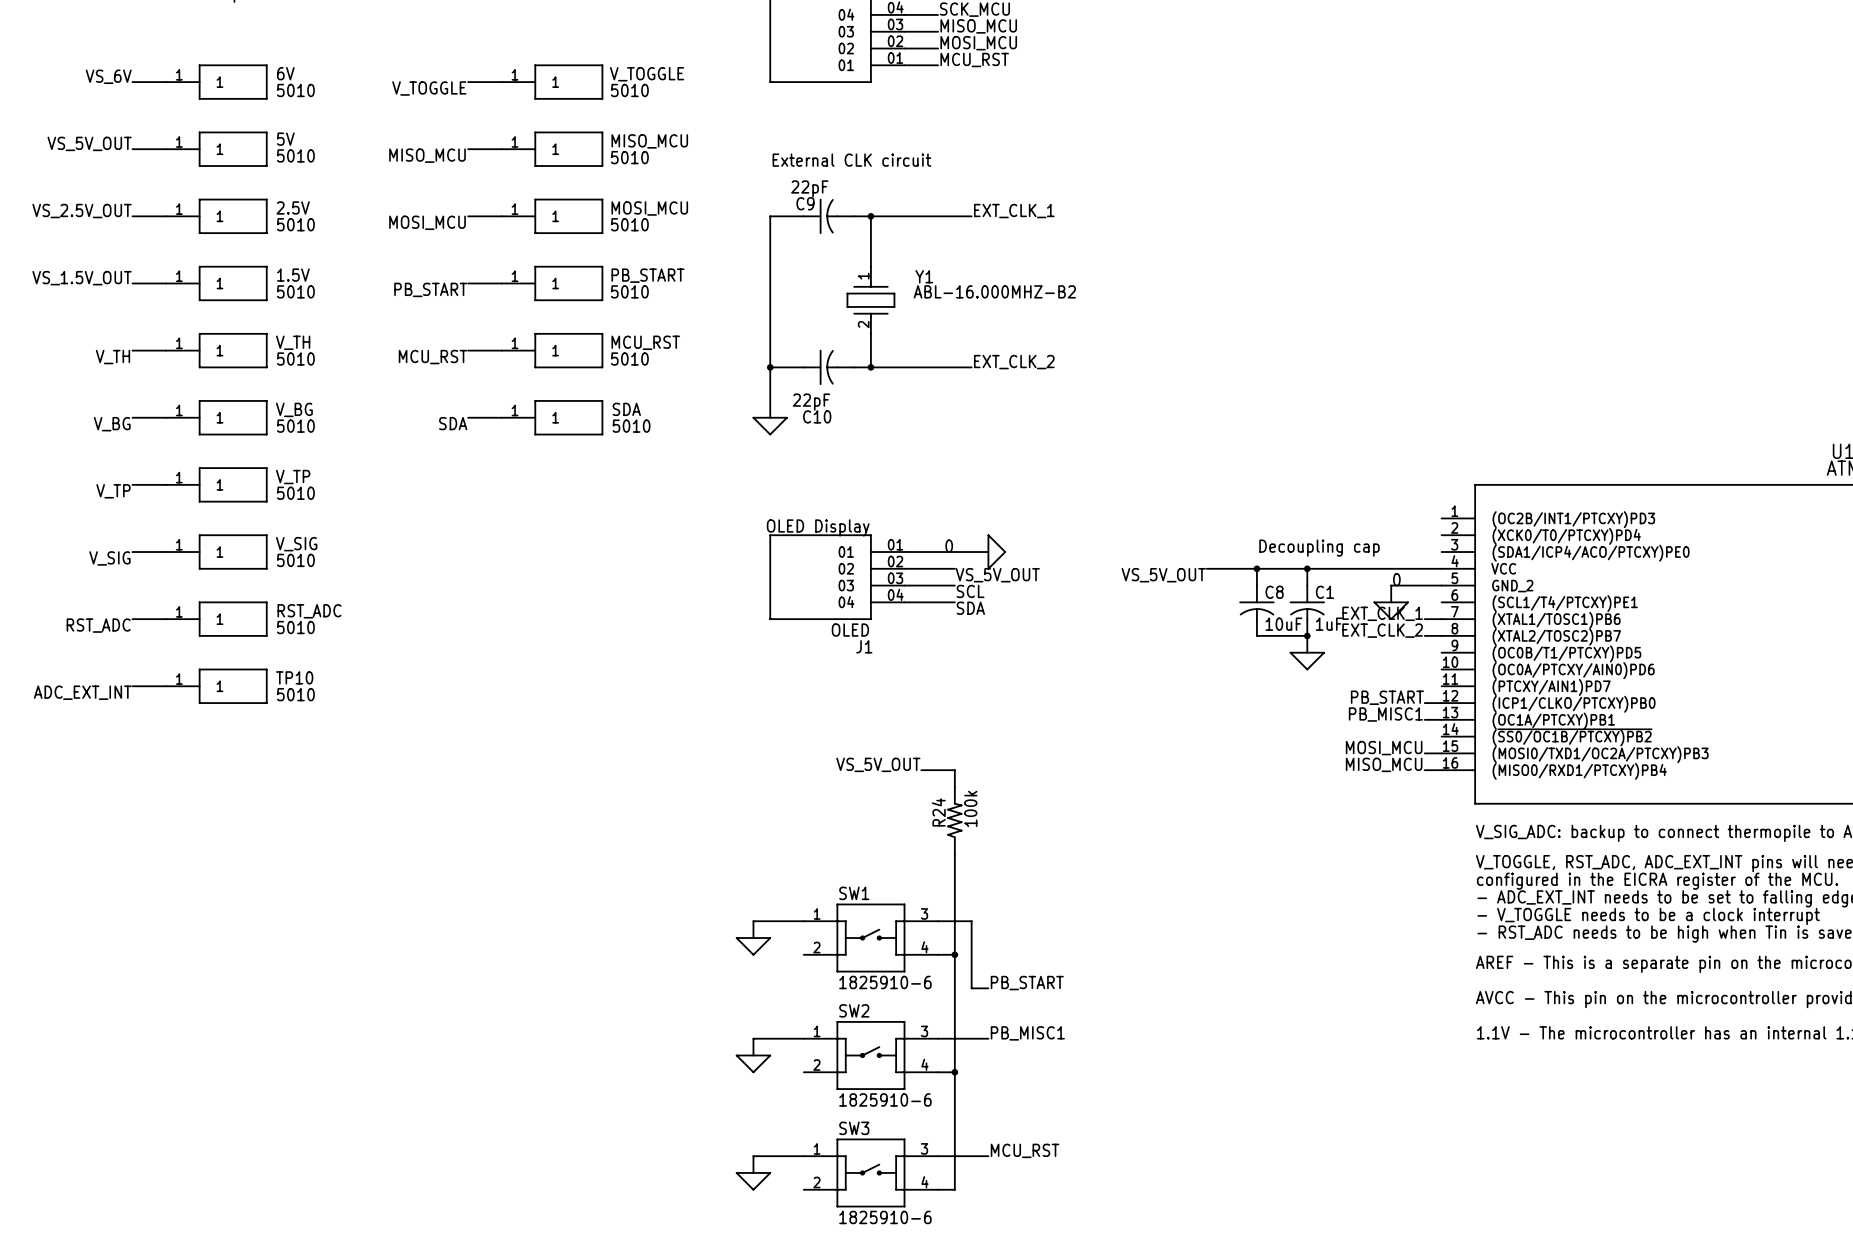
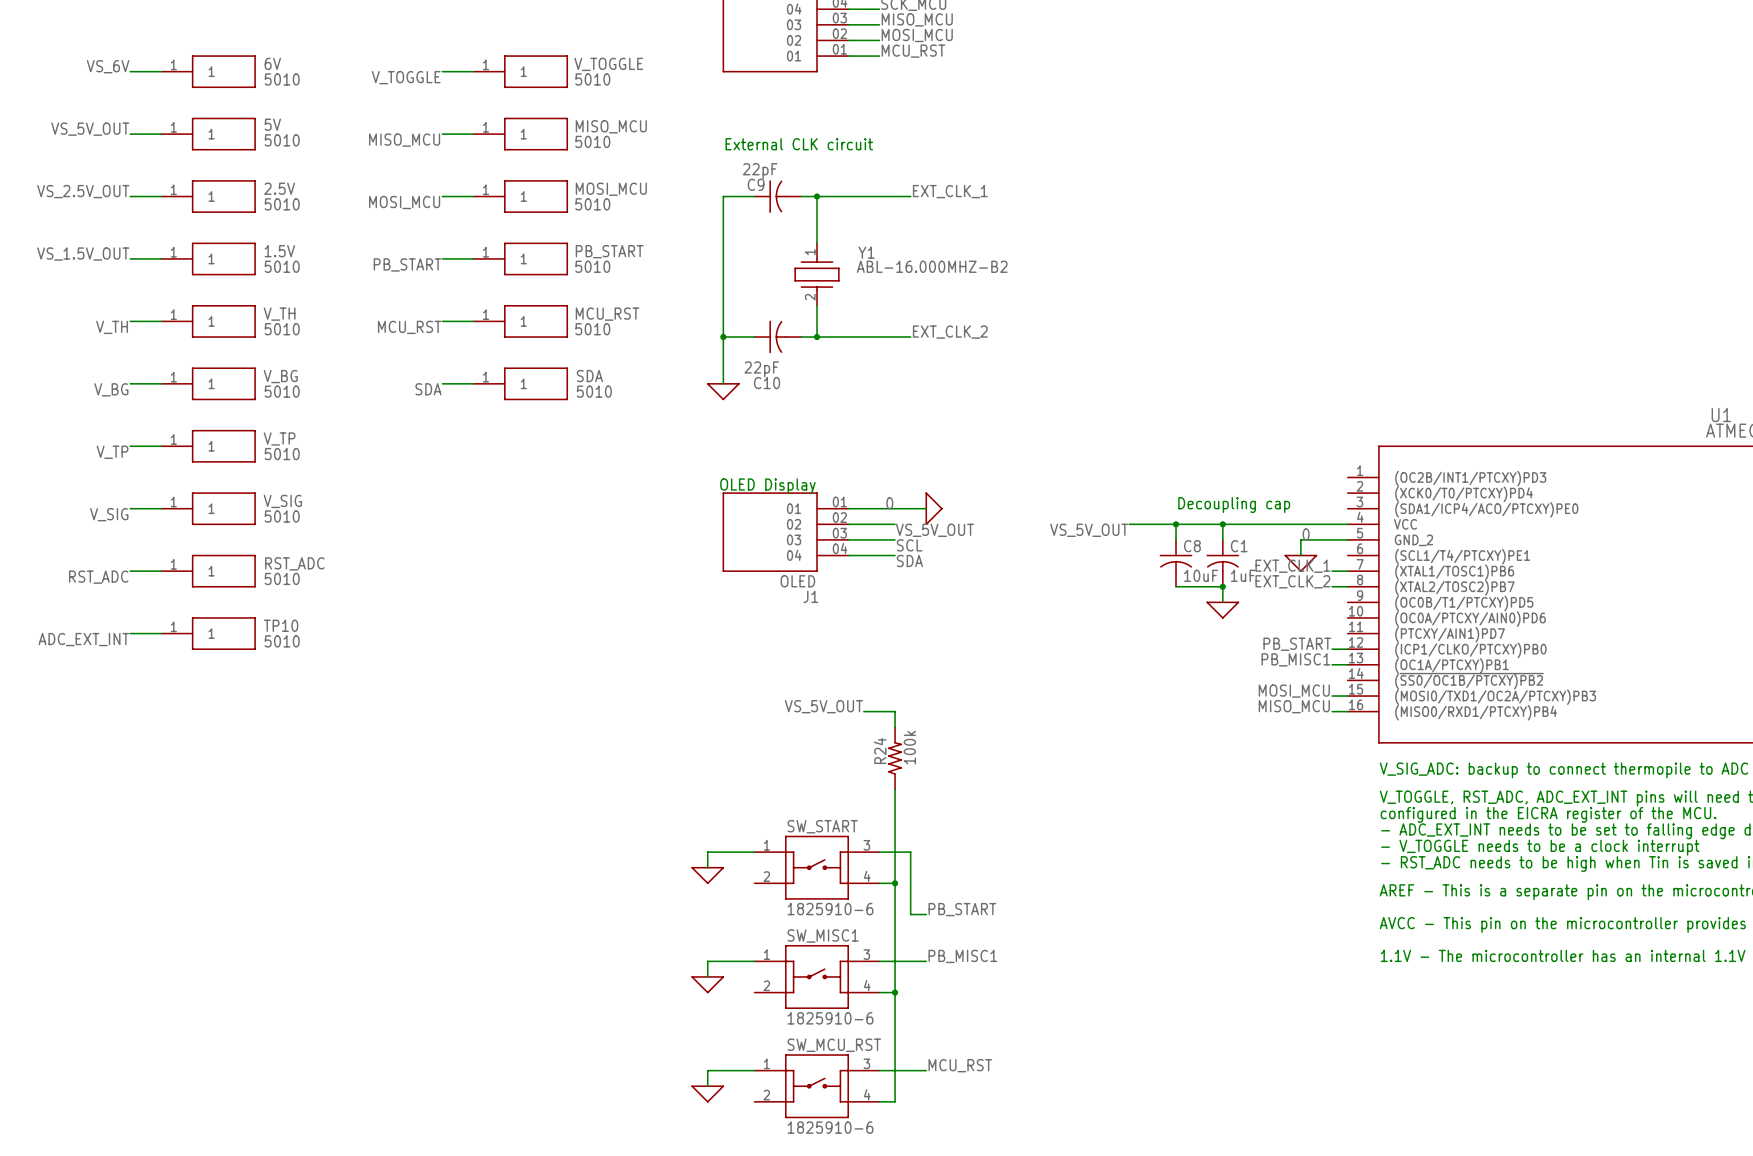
SW1 name: SW1 (854, 893) -> SW_START (822, 826)
SW2 name: SW2 (854, 1010) -> SW_MISC1 (823, 935)
SW3 name: SW3 (854, 1128) -> SW_MCU_RST (834, 1045)

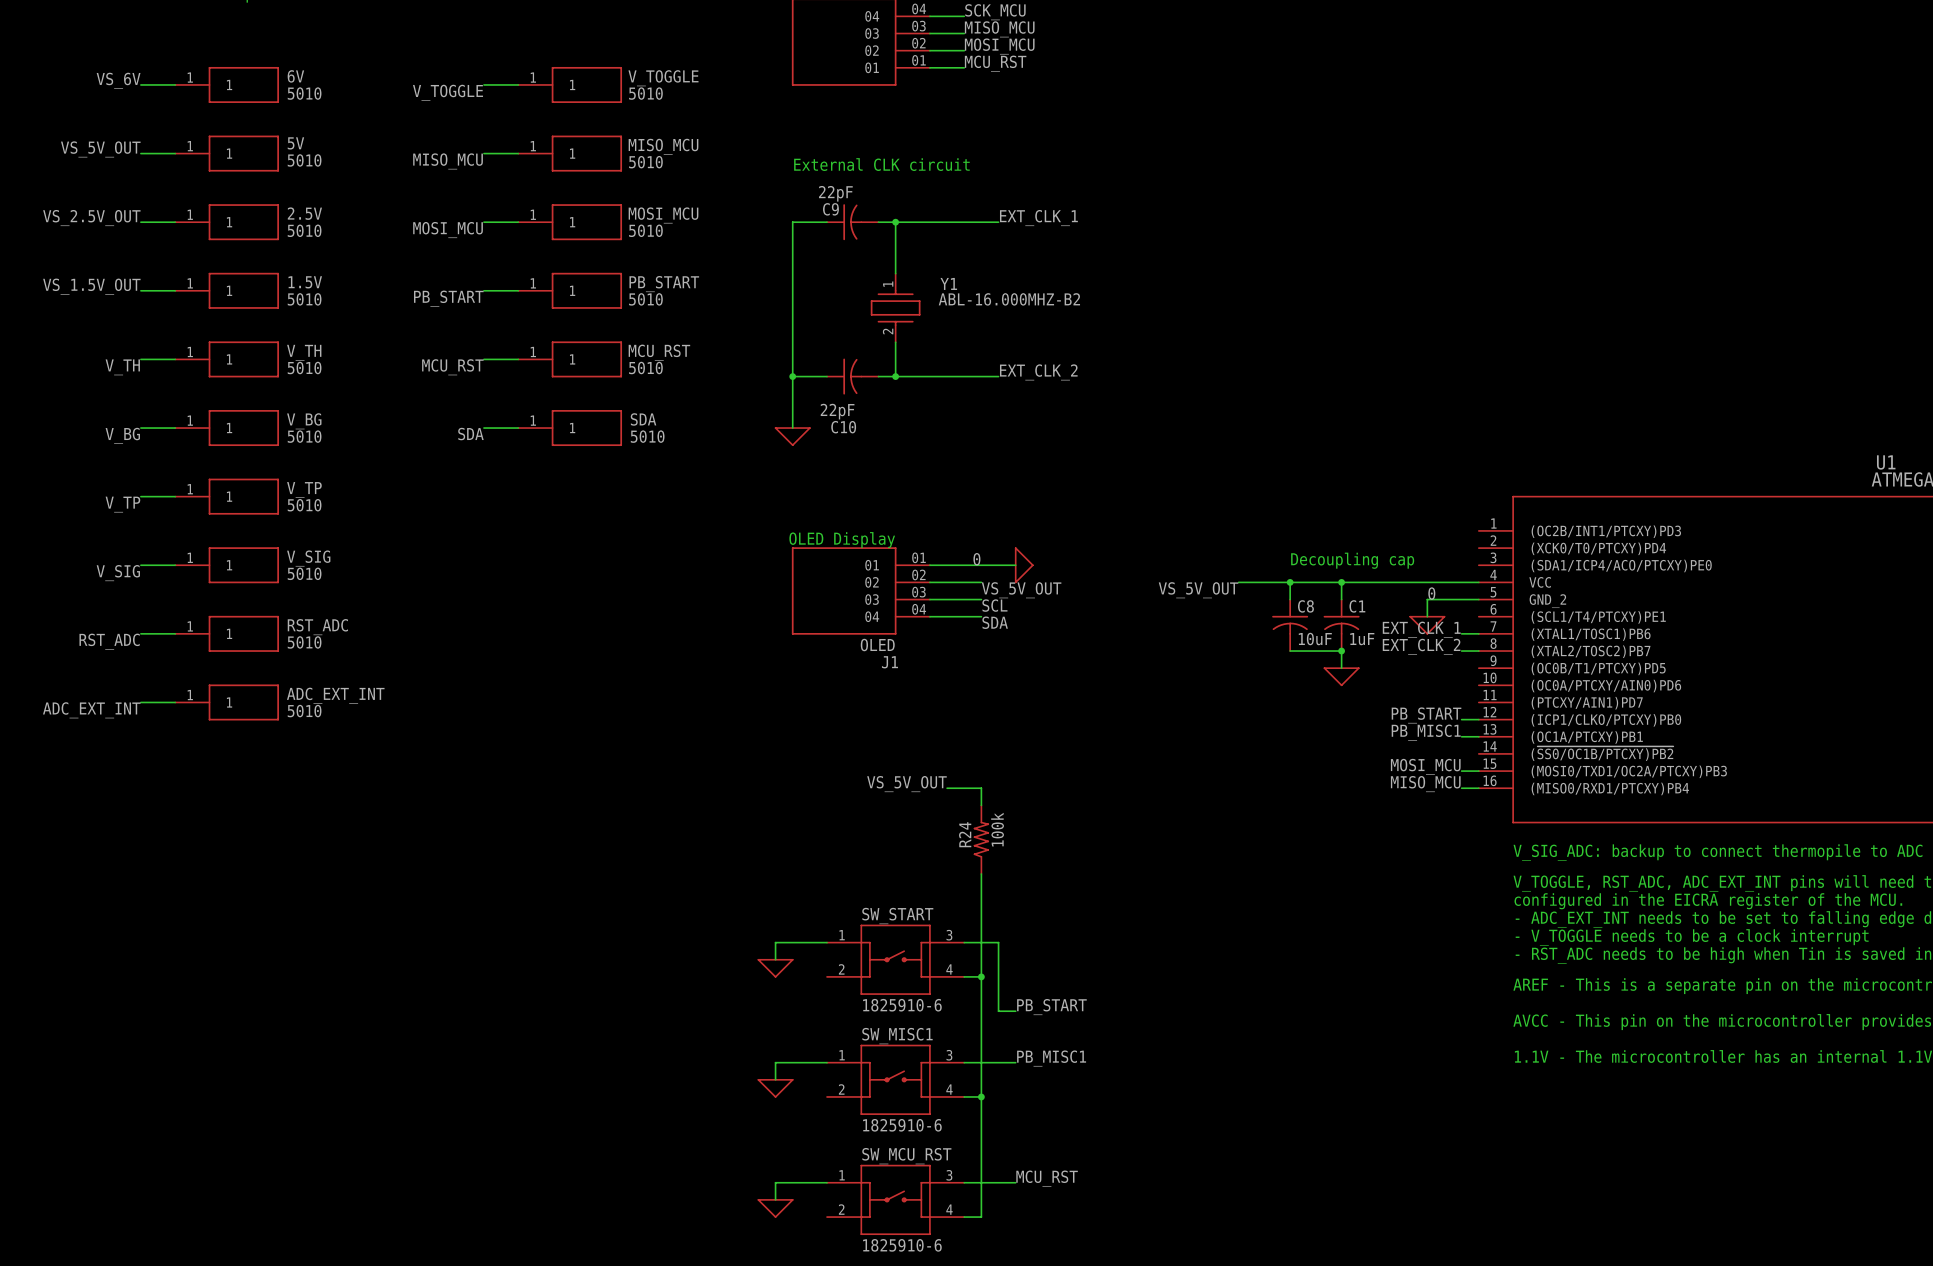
TP10 name: TP10 (281, 625) -> ADC_EXT_INT (335, 695)

